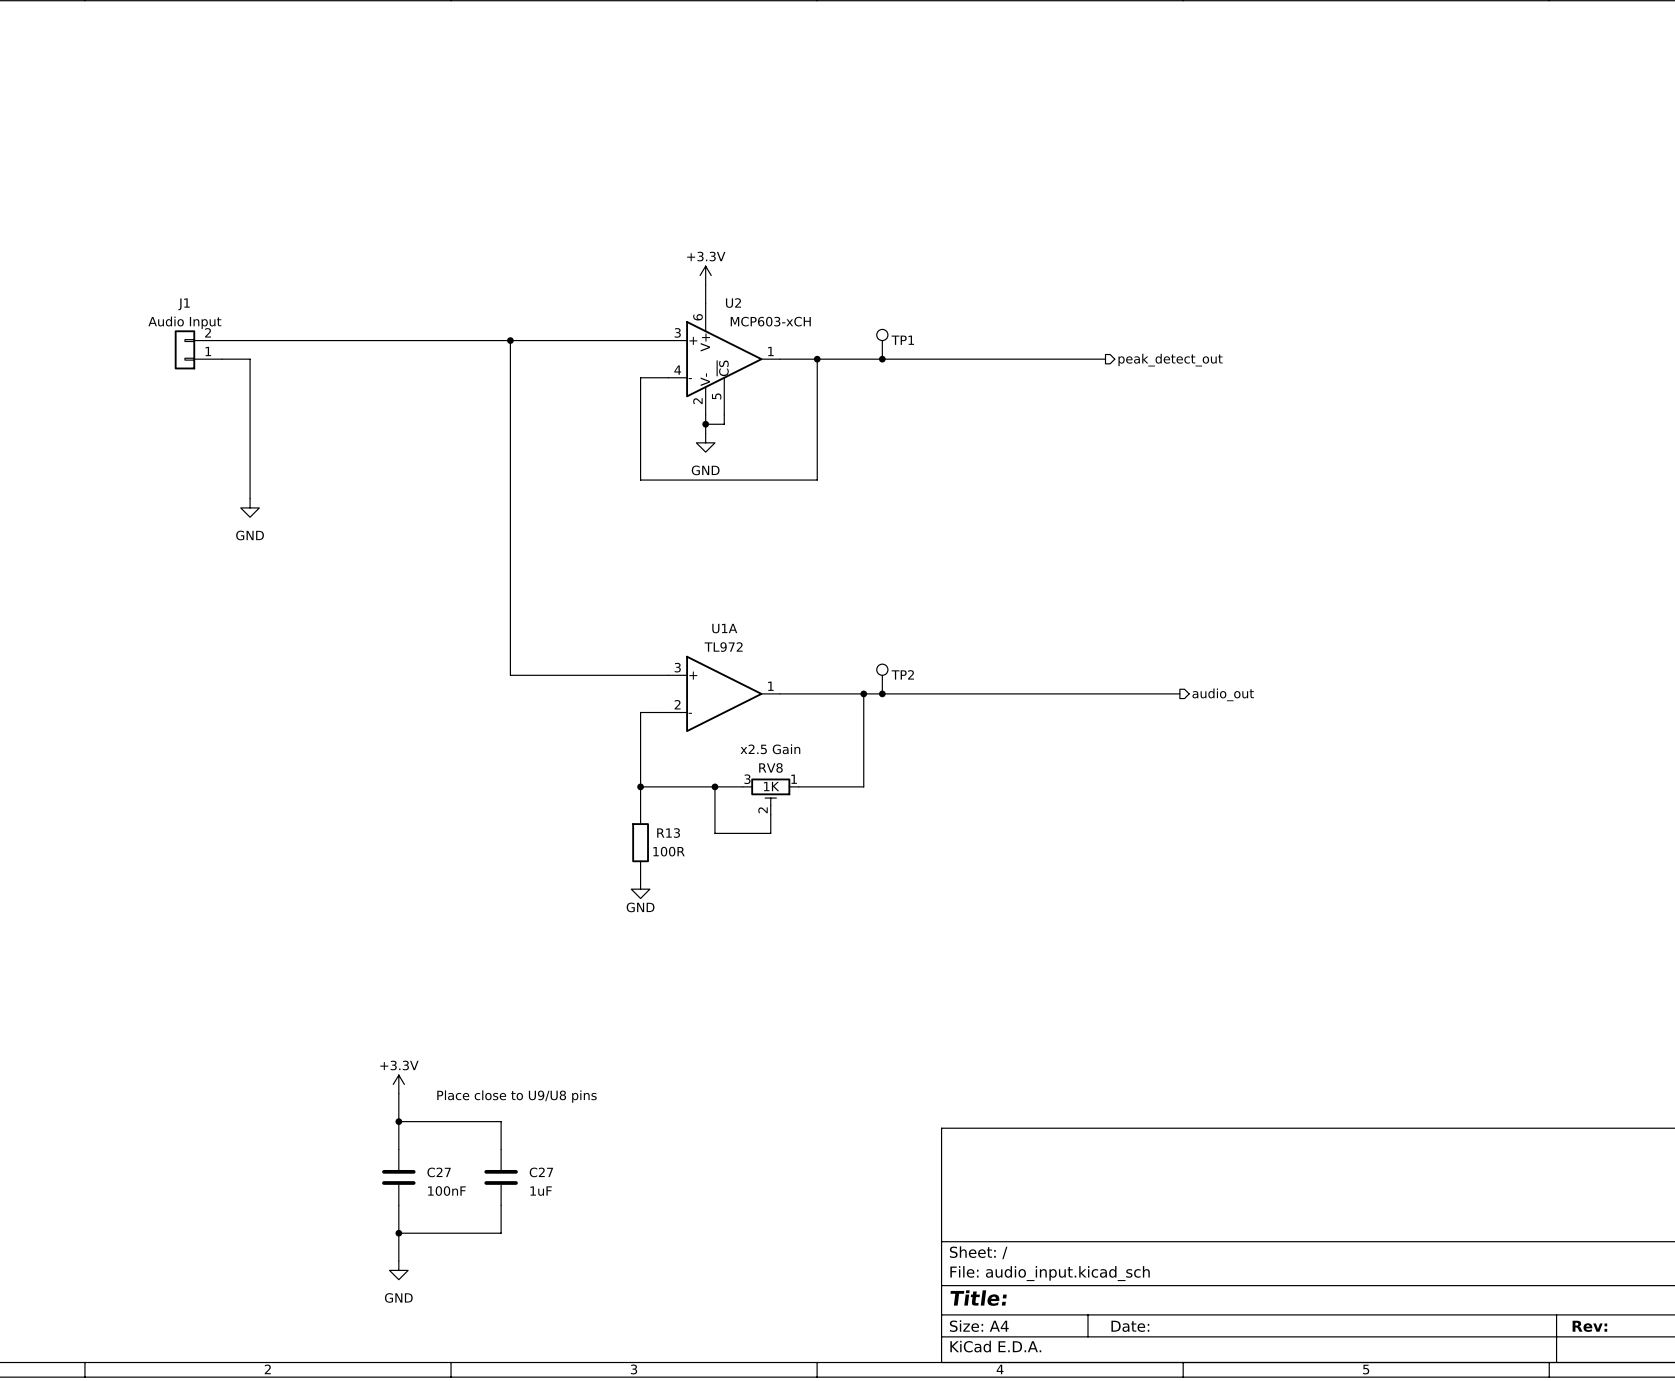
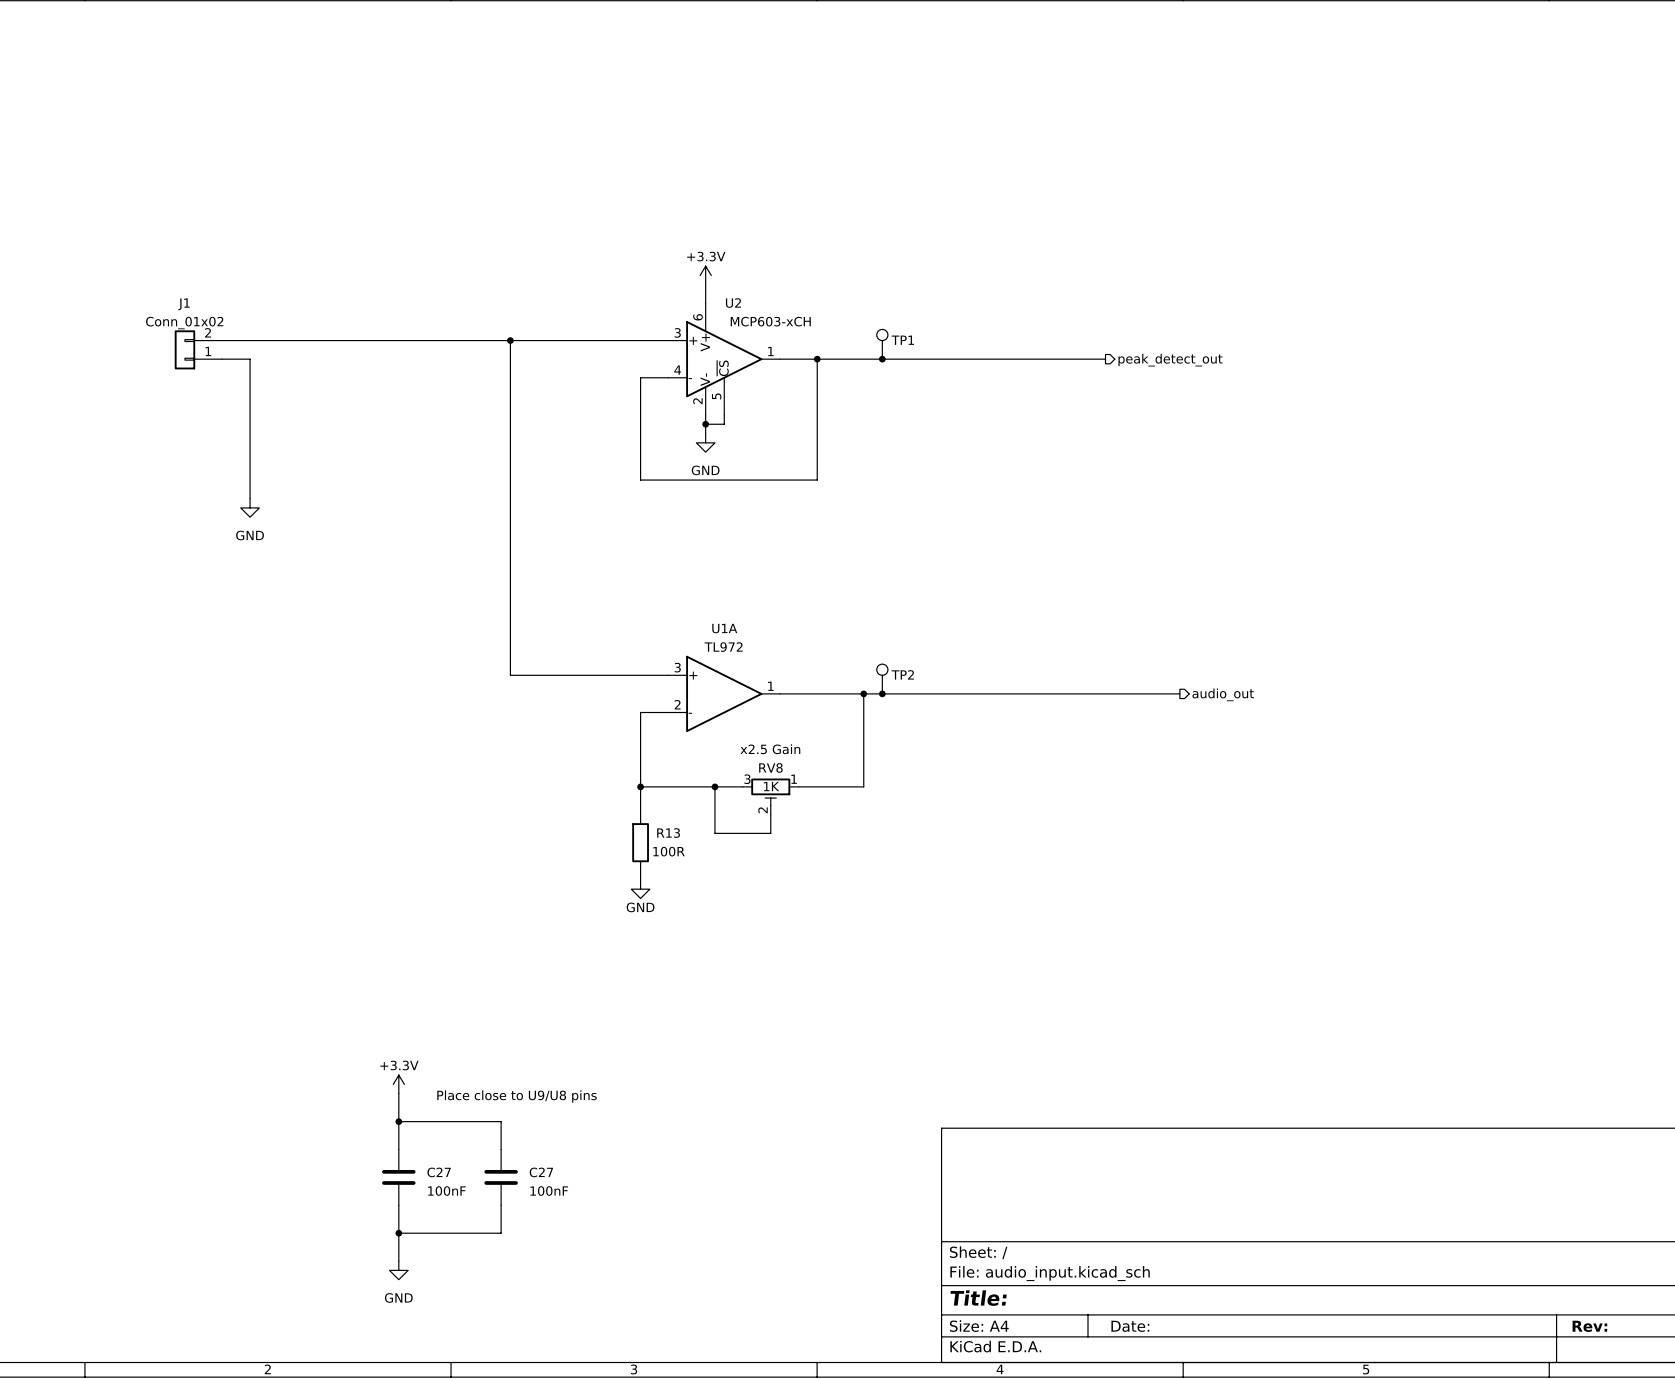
J1 value: Audio Input (184, 322) -> Conn_01x02 (184, 323)
C27 value: 1uF (541, 1191) -> 100nF (549, 1191)

